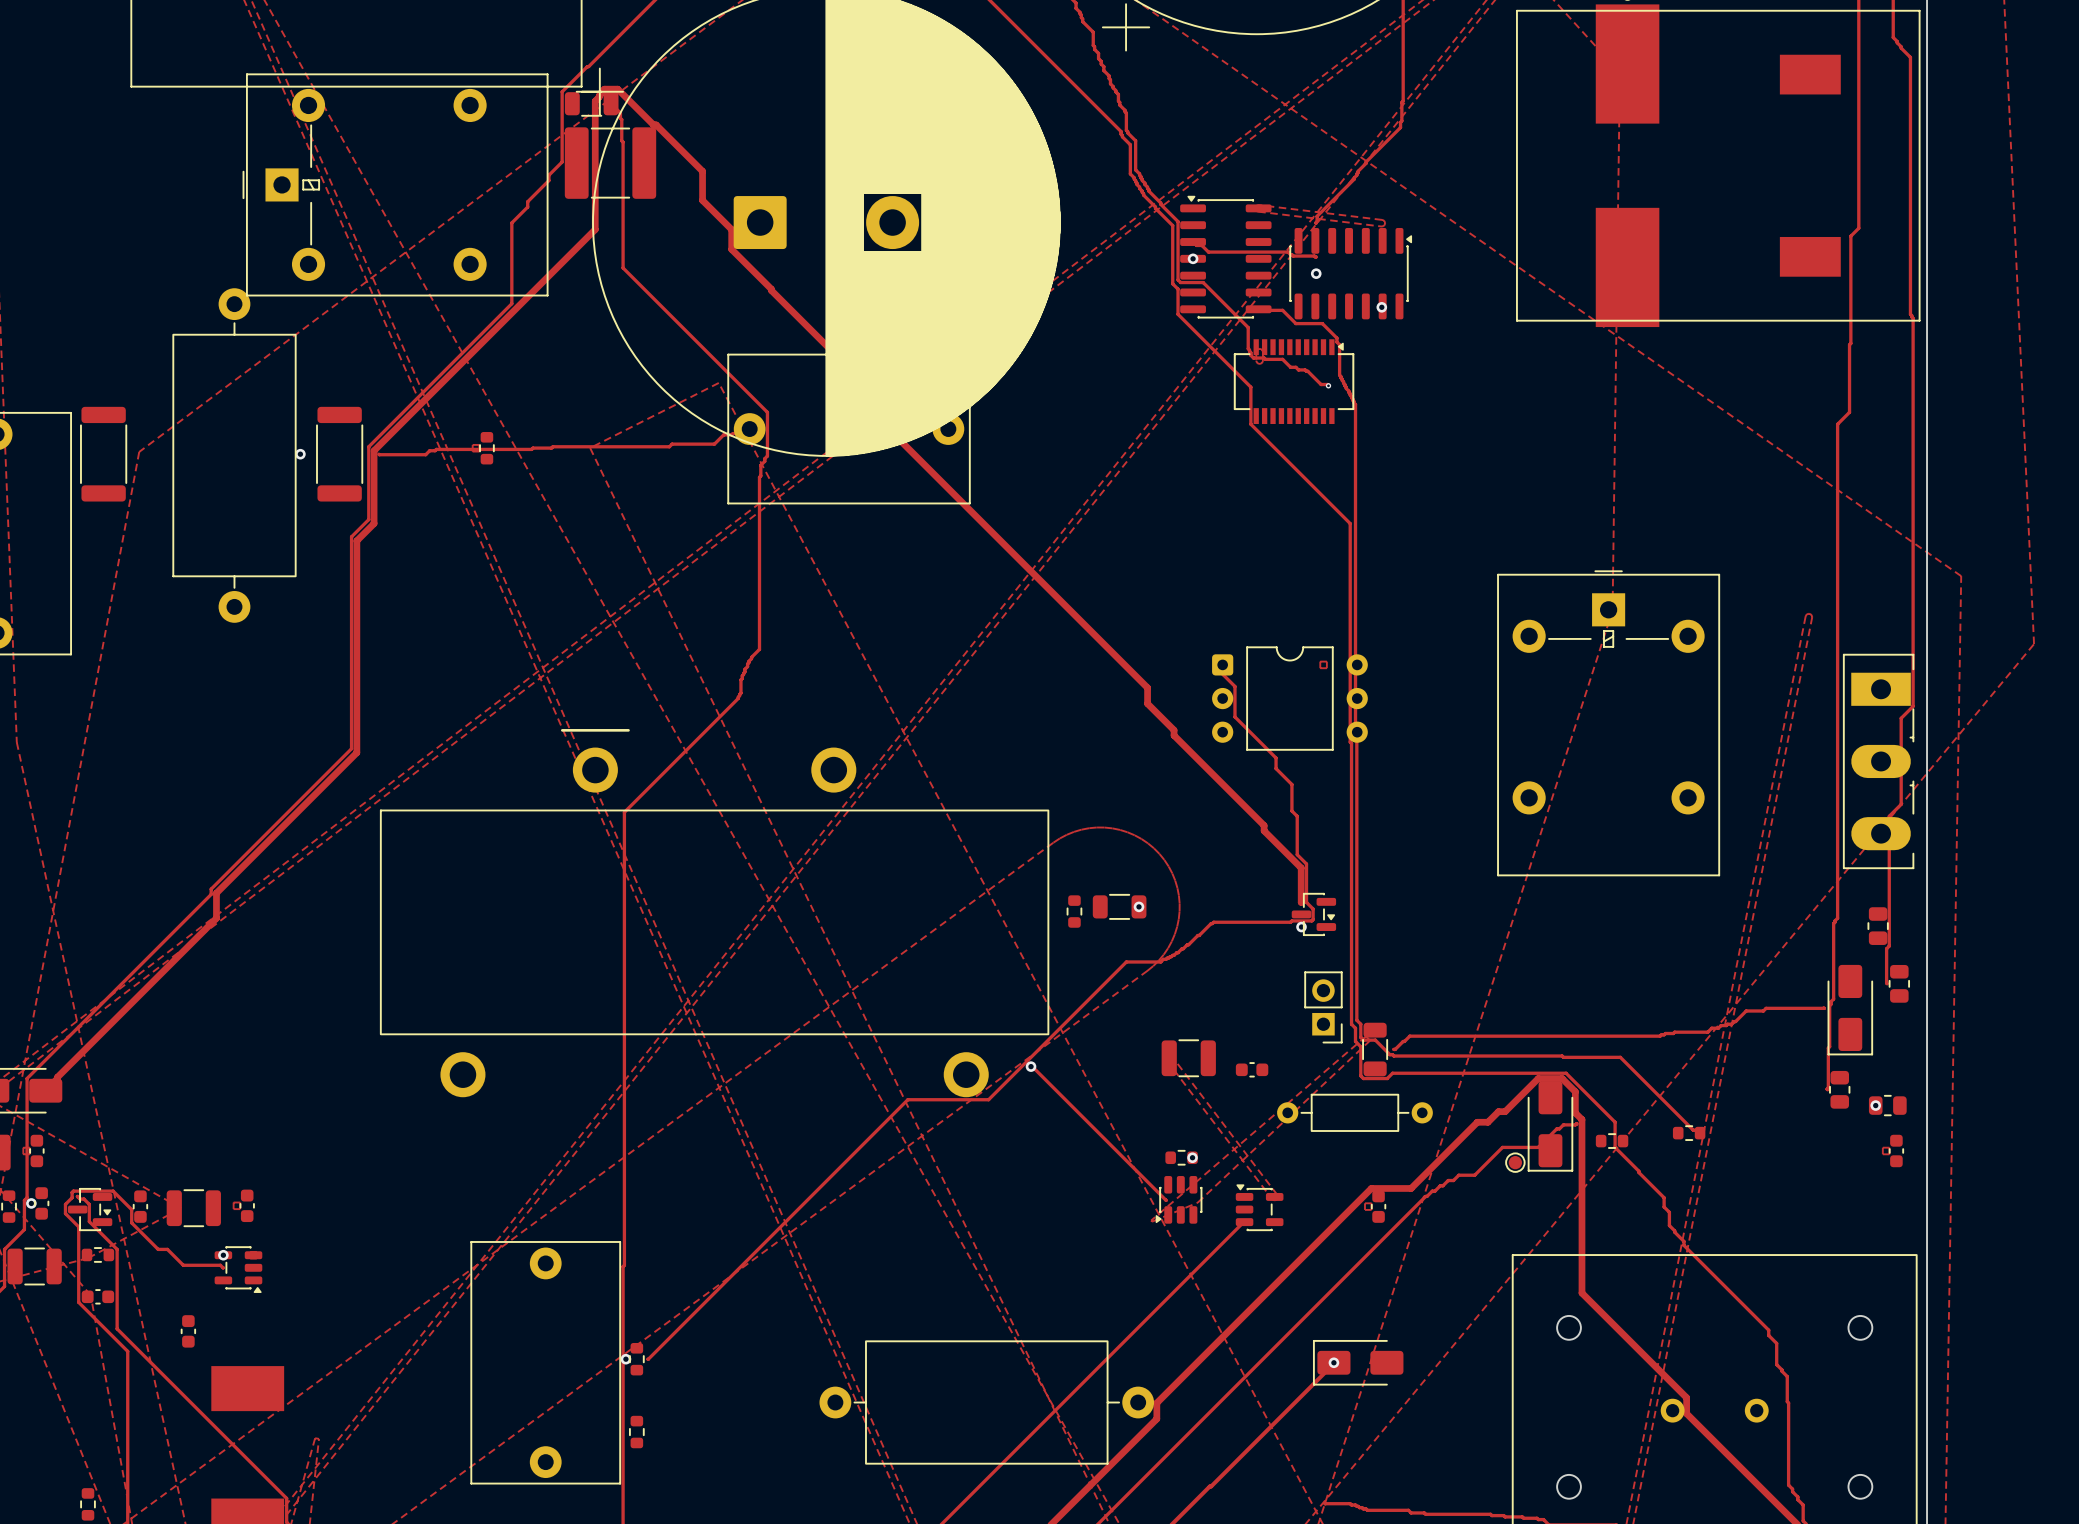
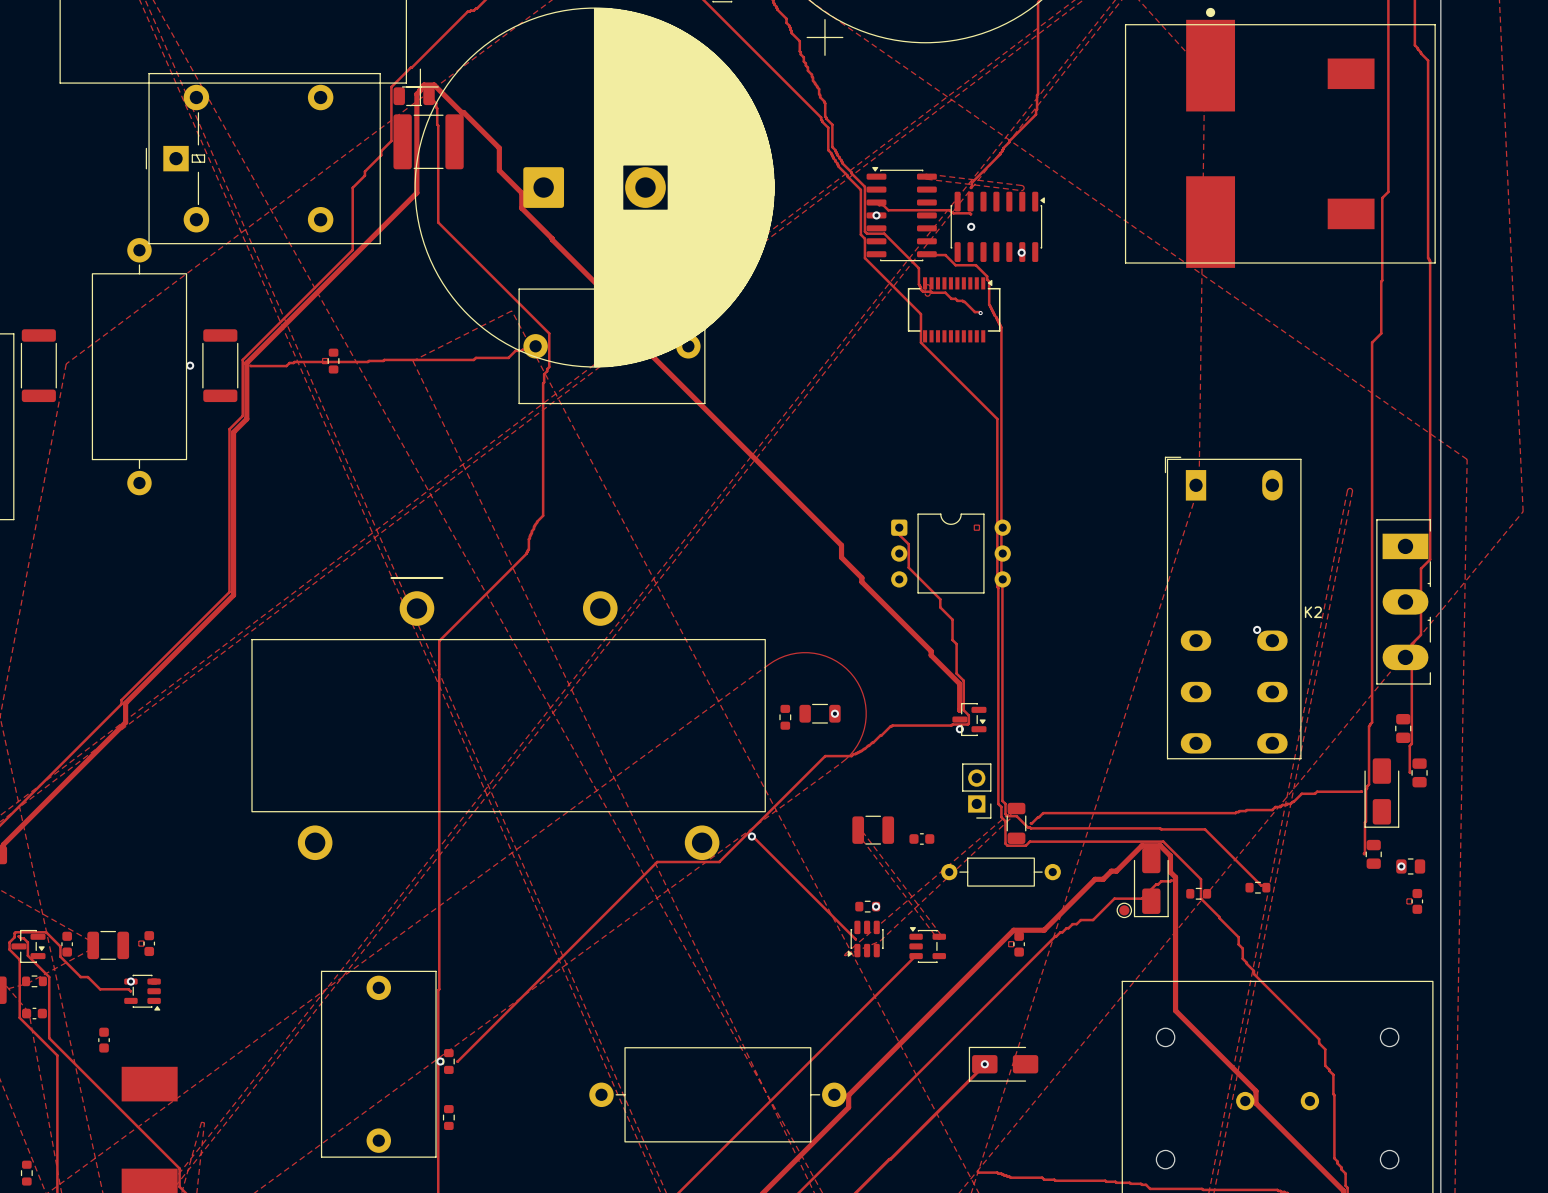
part: (1608, 723) -> none
K2: none -> (1233, 608)

